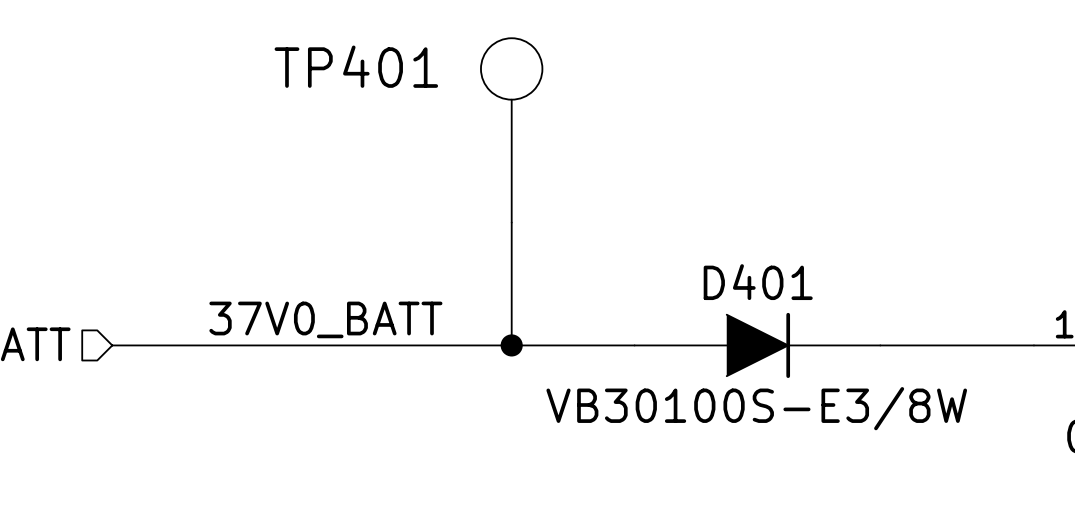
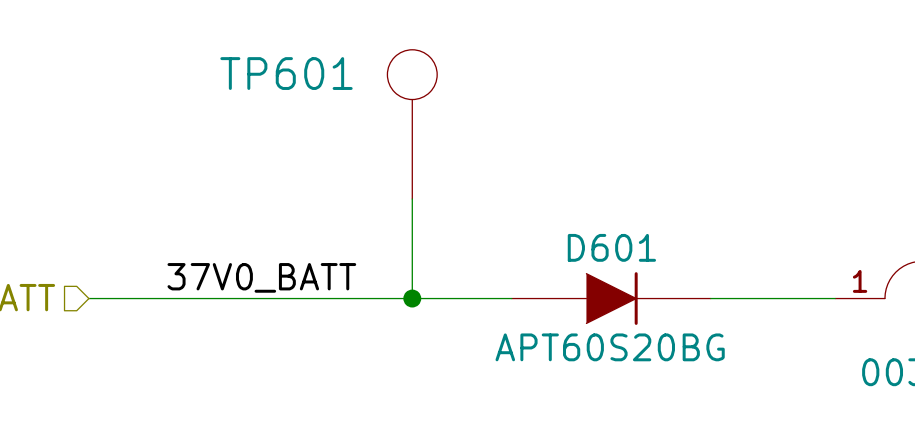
TP401 name: TP401 (356, 66) -> TP601 (286, 73)
D401 name: D401 (758, 282) -> D601 (611, 247)
D401 value: VB30100S-E3/8W (756, 408) -> APT60S20BG (610, 347)

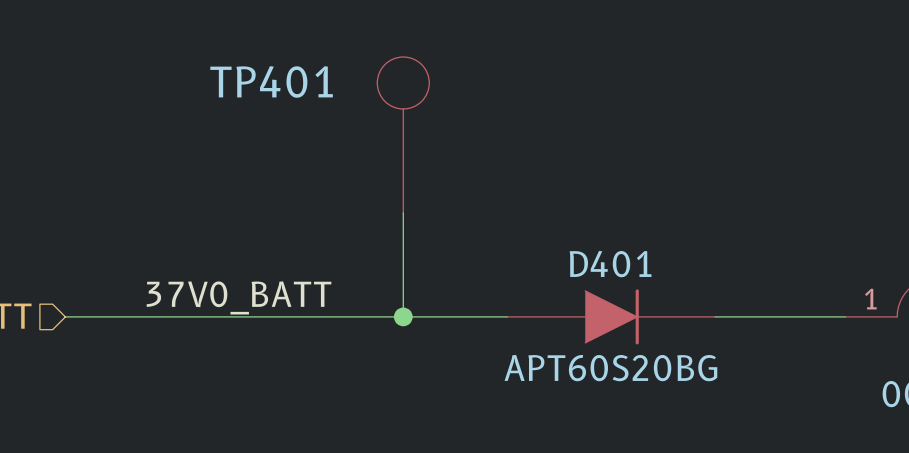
TP601 name: TP601 (286, 73) -> TP401 (271, 81)
D601 name: D601 (611, 247) -> D401 (610, 264)

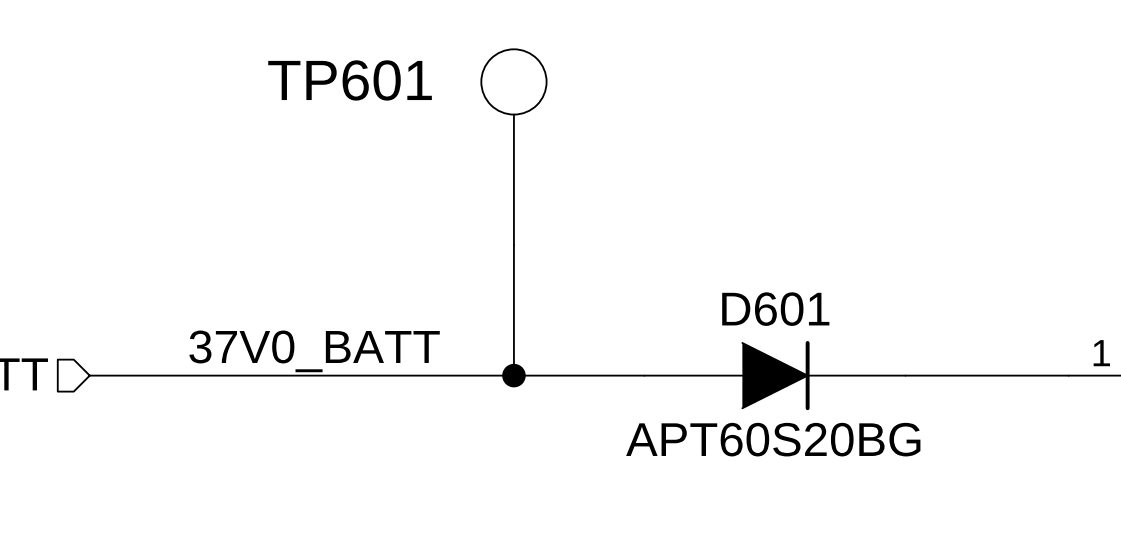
TP401 name: TP401 (271, 81) -> TP601 (350, 80)
D401 name: D401 (610, 264) -> D601 (775, 309)

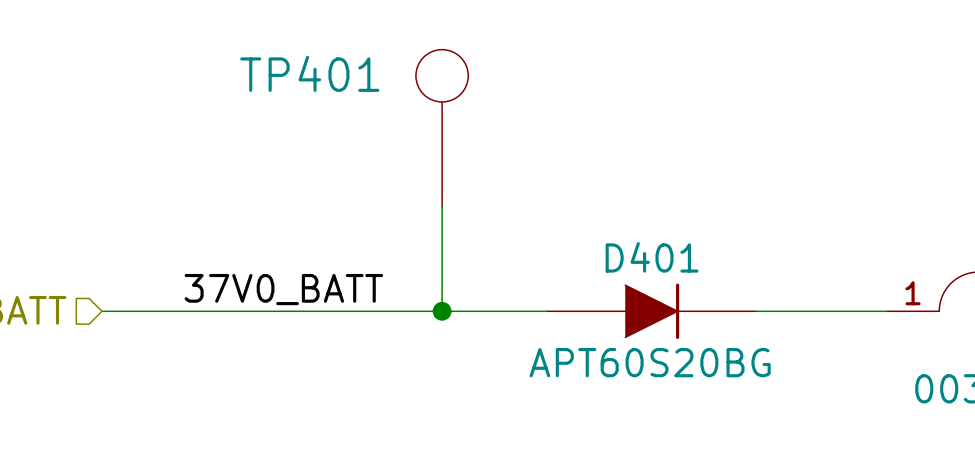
TP601 name: TP601 (350, 80) -> TP401 (309, 73)
D601 name: D601 (775, 309) -> D401 (652, 257)

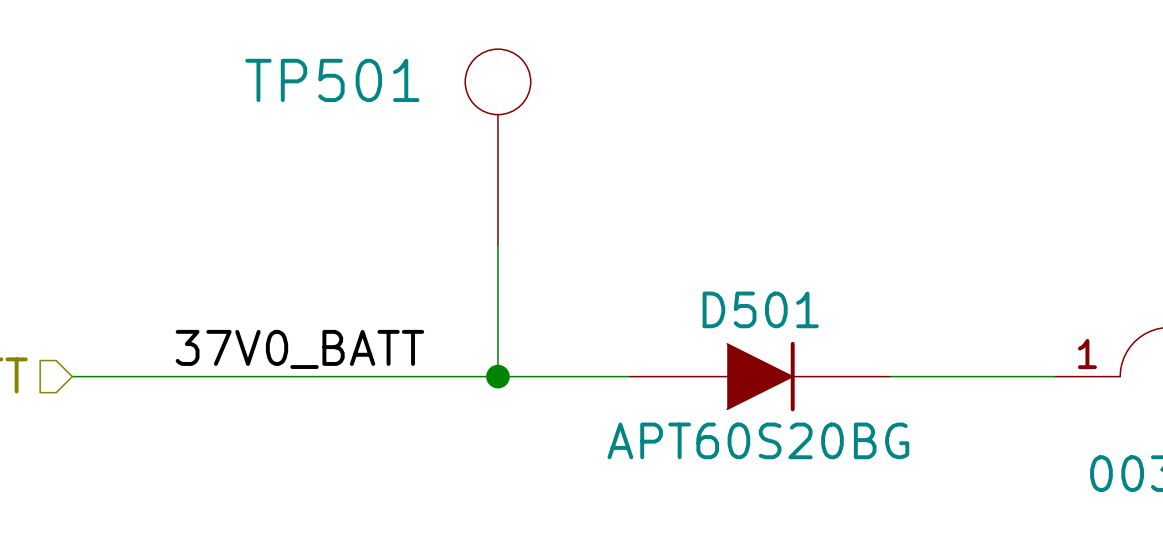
TP401 name: TP401 (309, 73) -> TP501 (332, 80)
D401 name: D401 (652, 257) -> D501 (760, 309)

